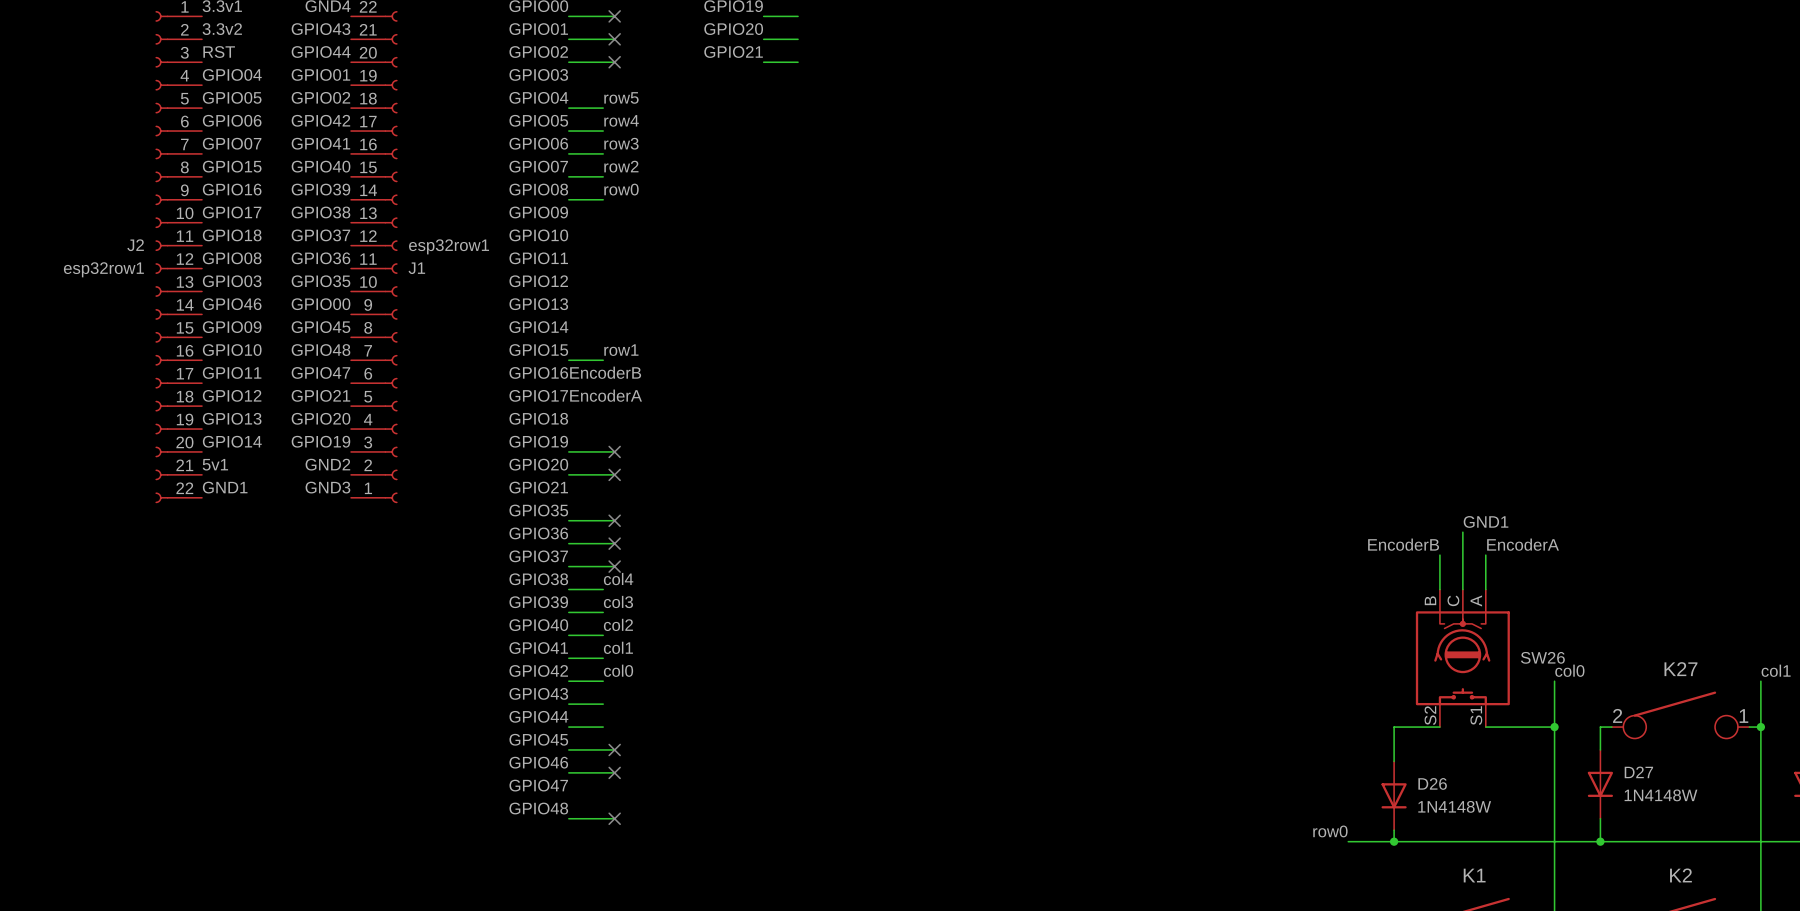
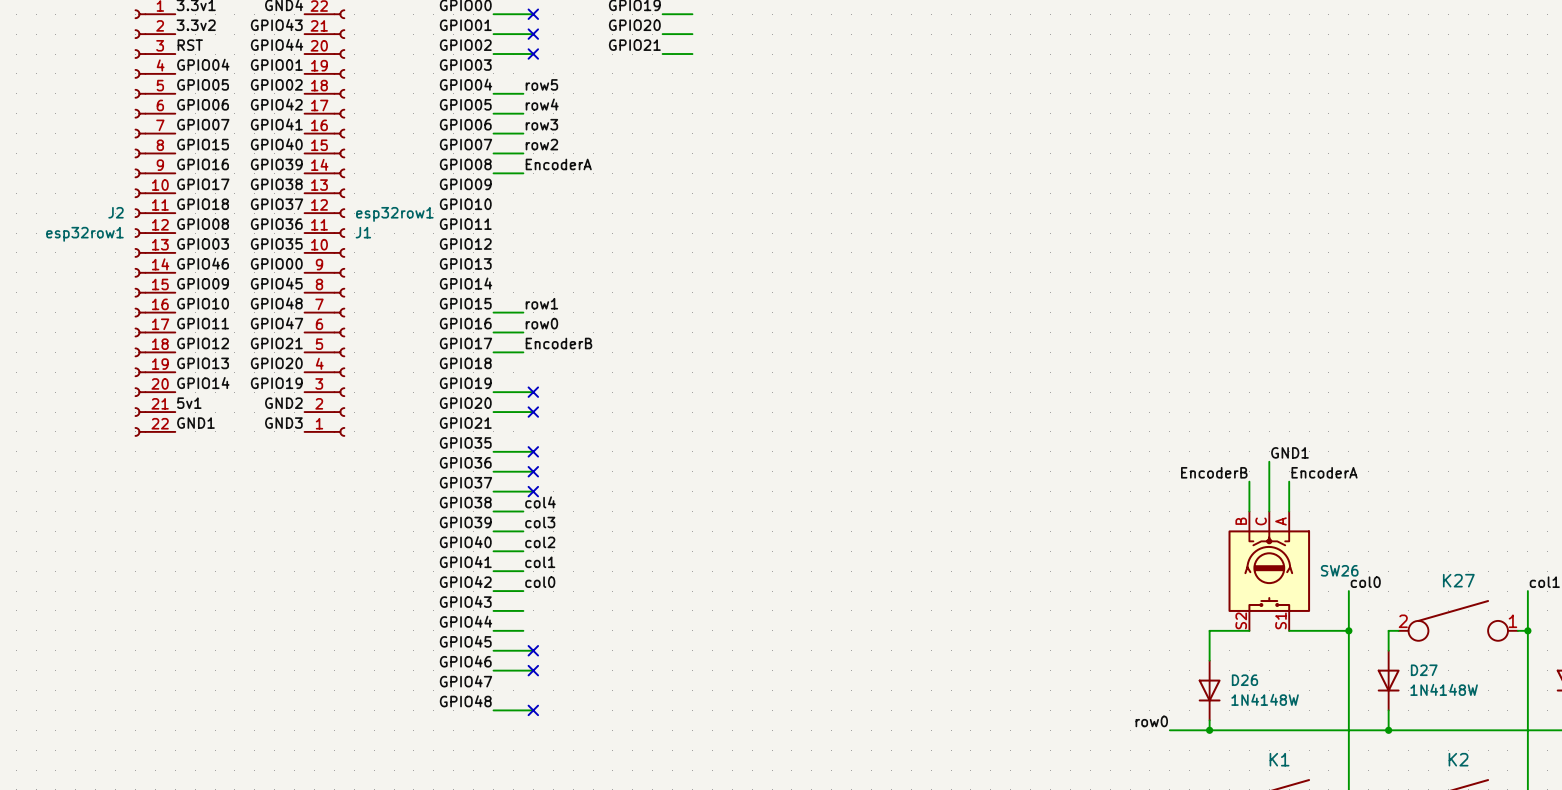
label: row0 (621, 189) -> EncoderA (558, 164)
label position: EncoderB (605, 372) -> EncoderB (558, 343)
label: none -> row0 (541, 323)
wire: none -> (493, 332) (523, 332)
label: EncoderA (606, 395) -> none
wire: none -> (493, 352) (523, 352)

